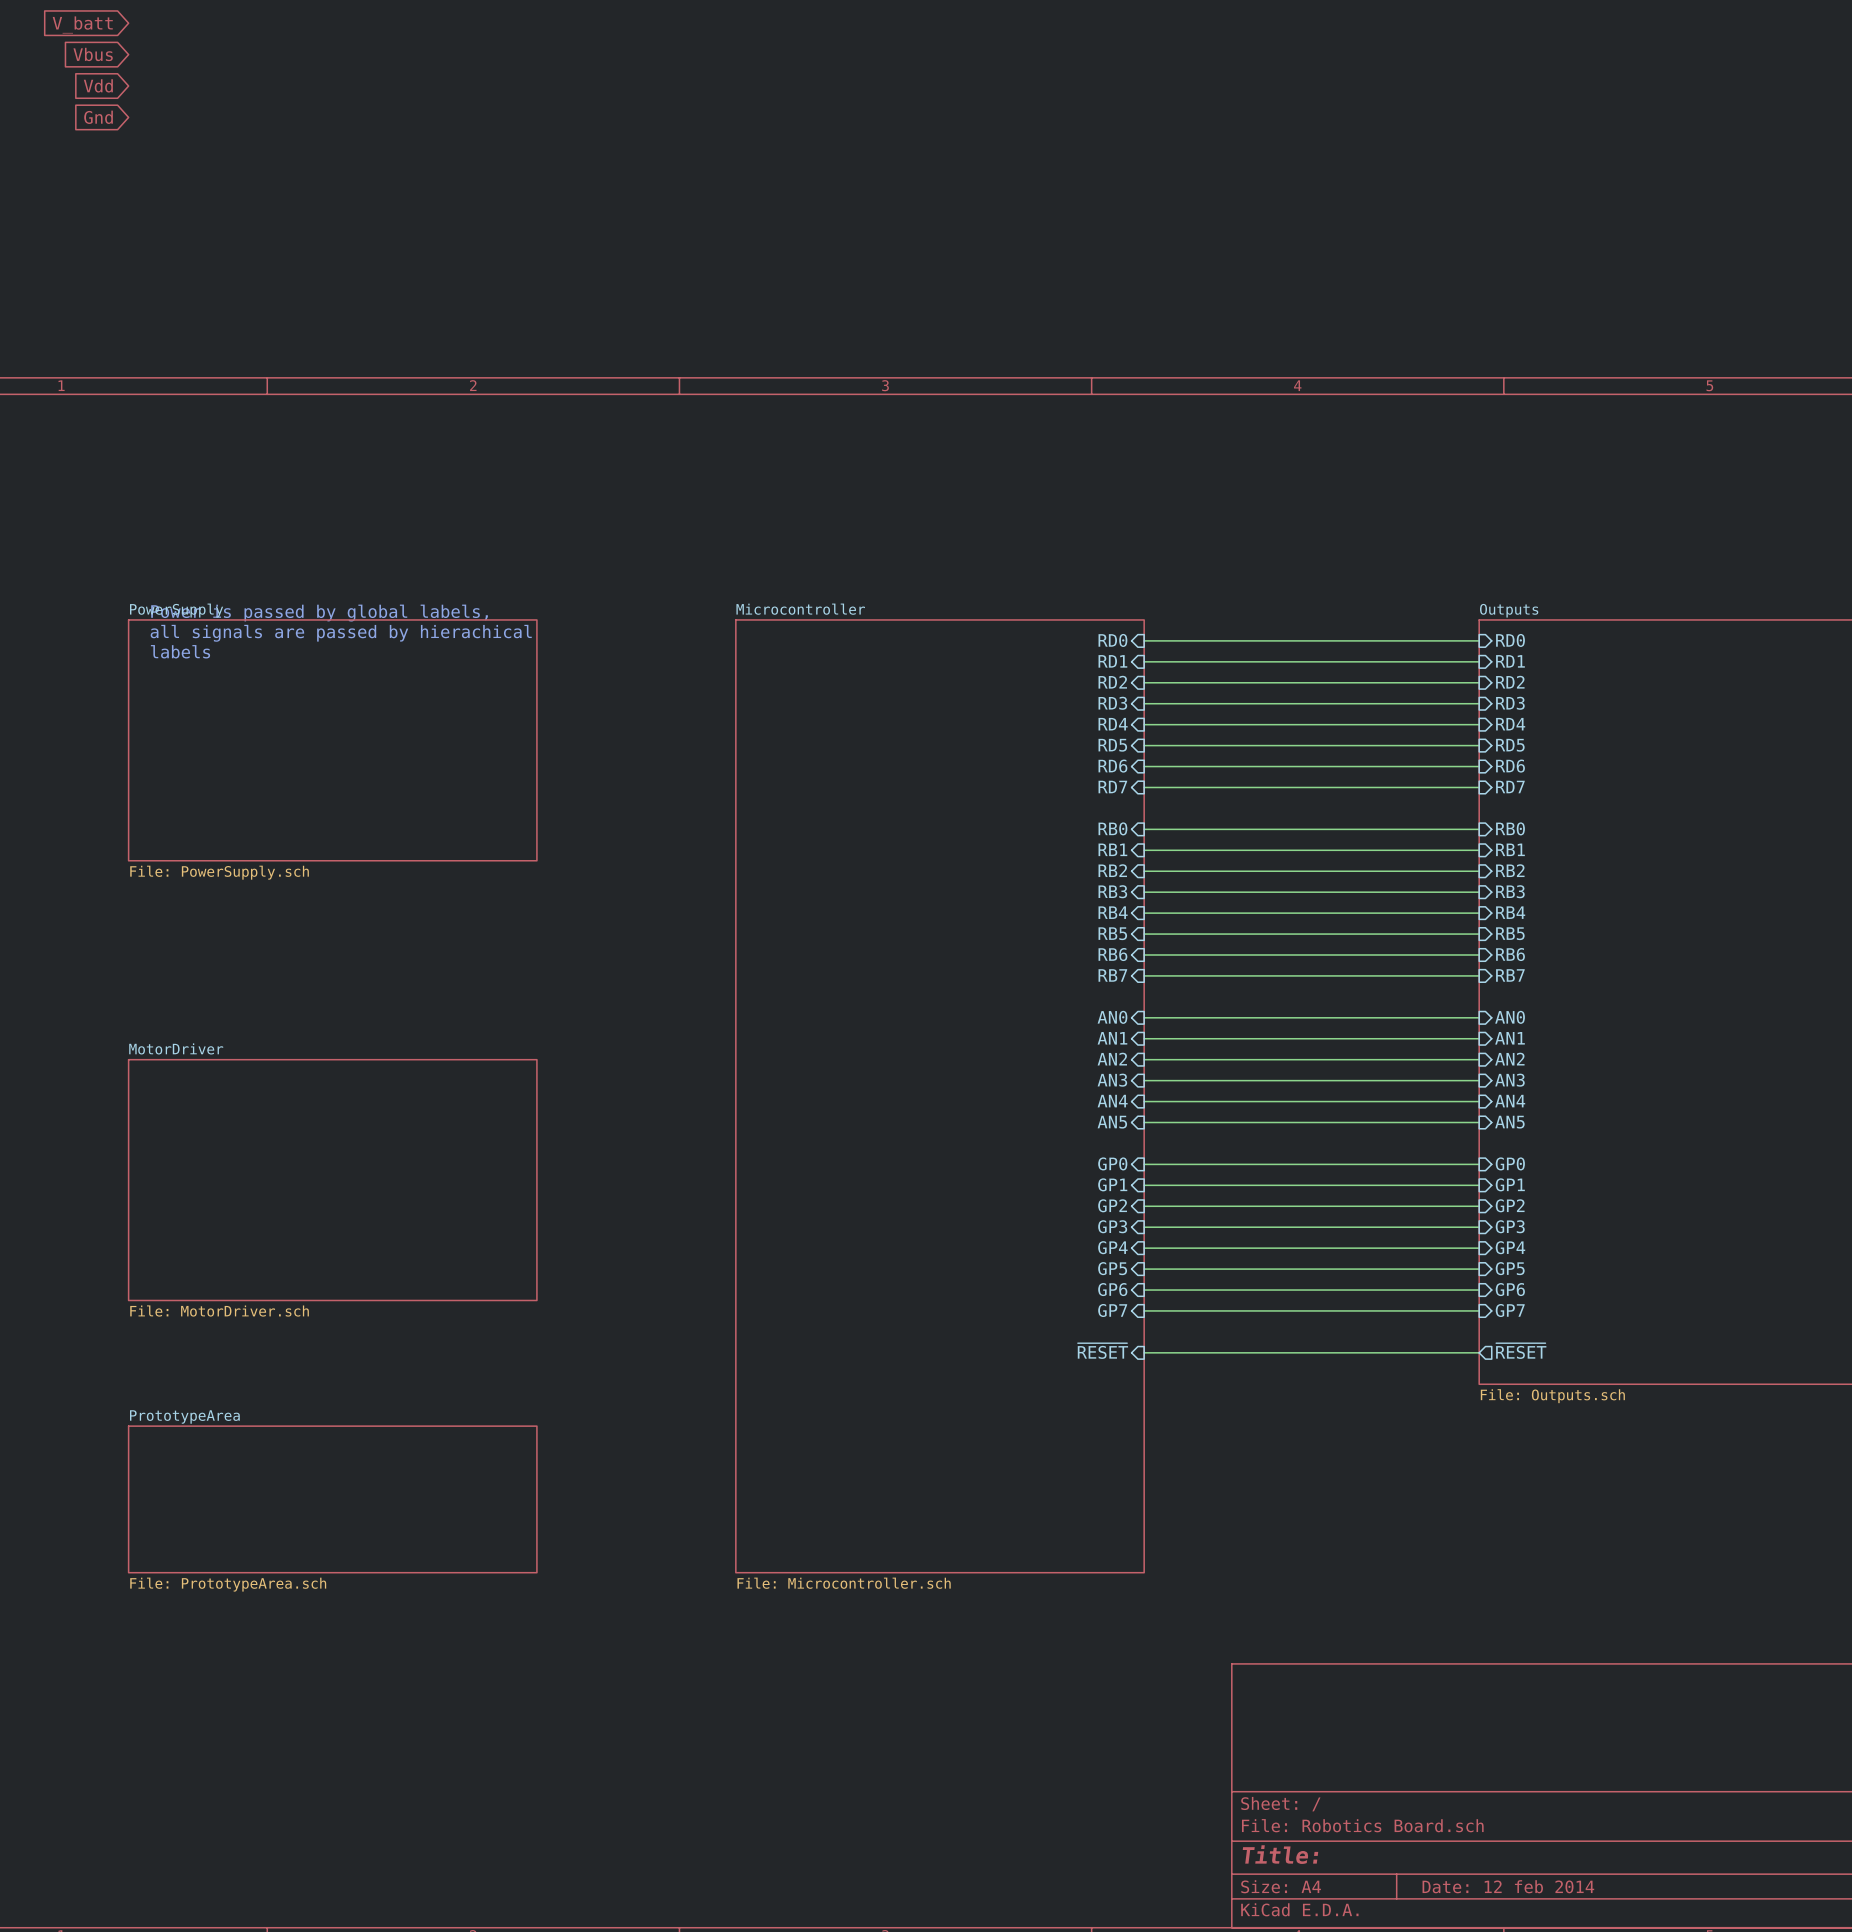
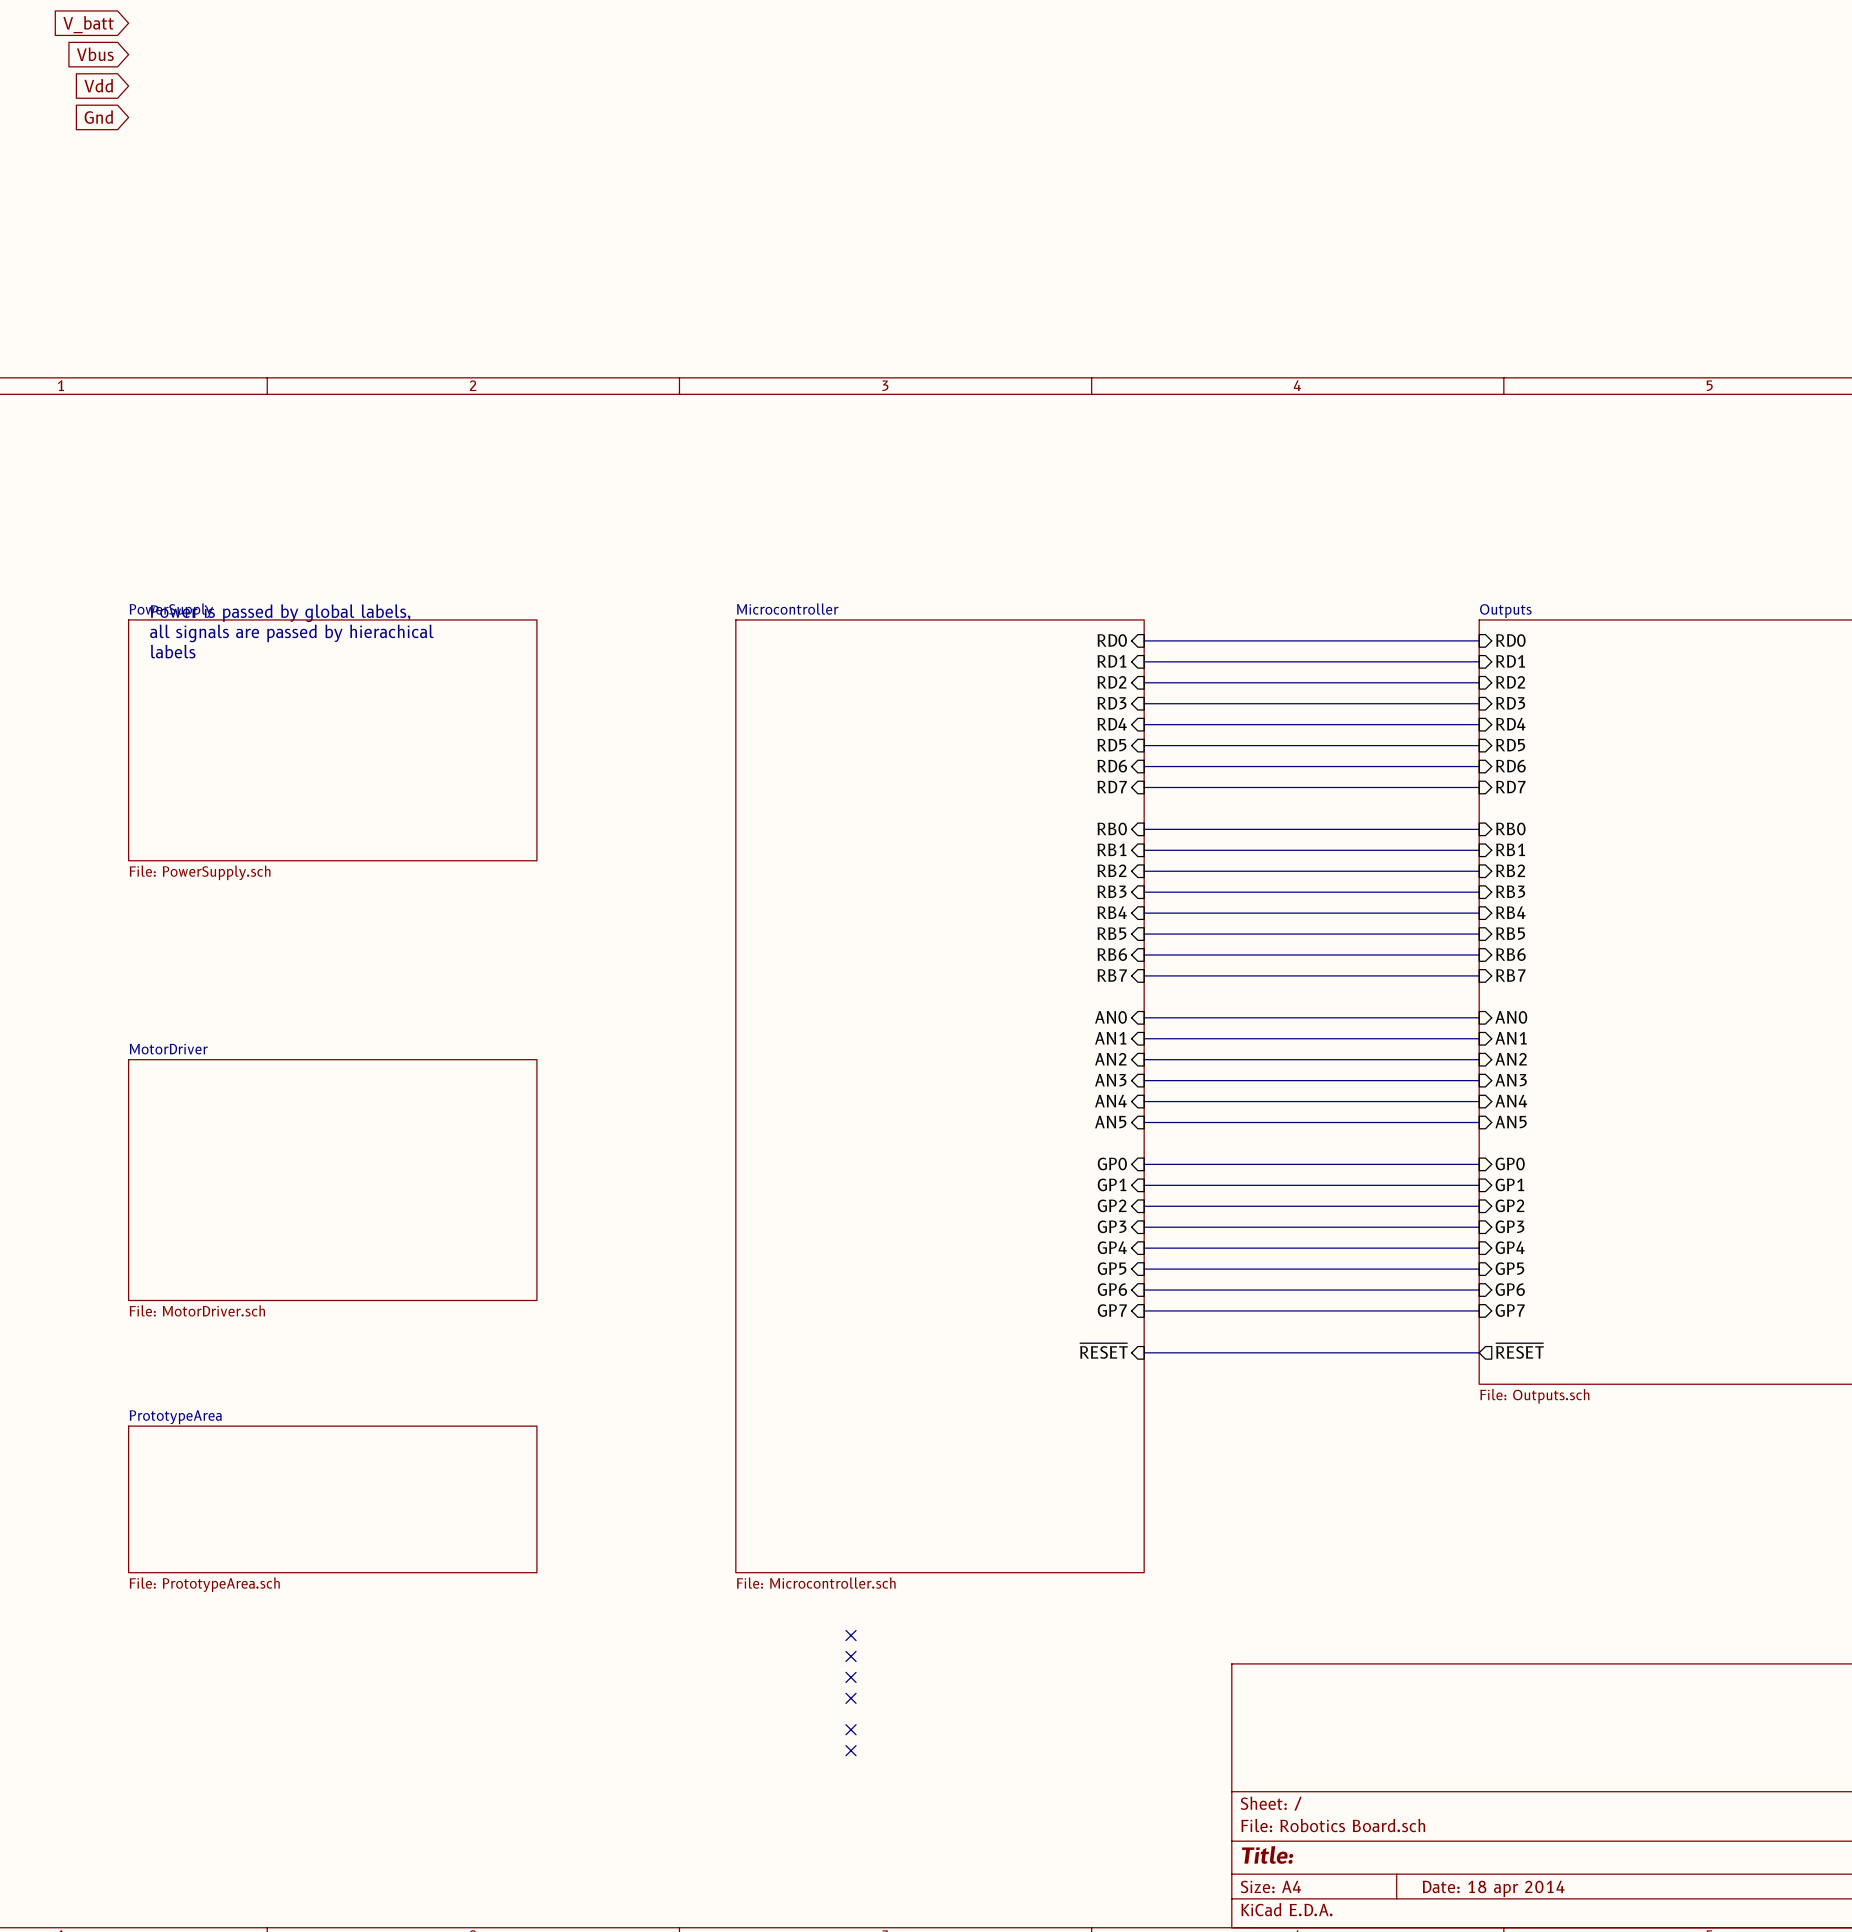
no-connect mark: none -> (851, 1635)
no-connect mark: none -> (851, 1656)
no-connect mark: none -> (851, 1677)
no-connect mark: none -> (851, 1698)
no-connect mark: none -> (851, 1729)
no-connect mark: none -> (851, 1750)
title block: Date: 12 feb 2014 (1508, 1886) -> Date: 18 apr 2014 (1493, 1888)

